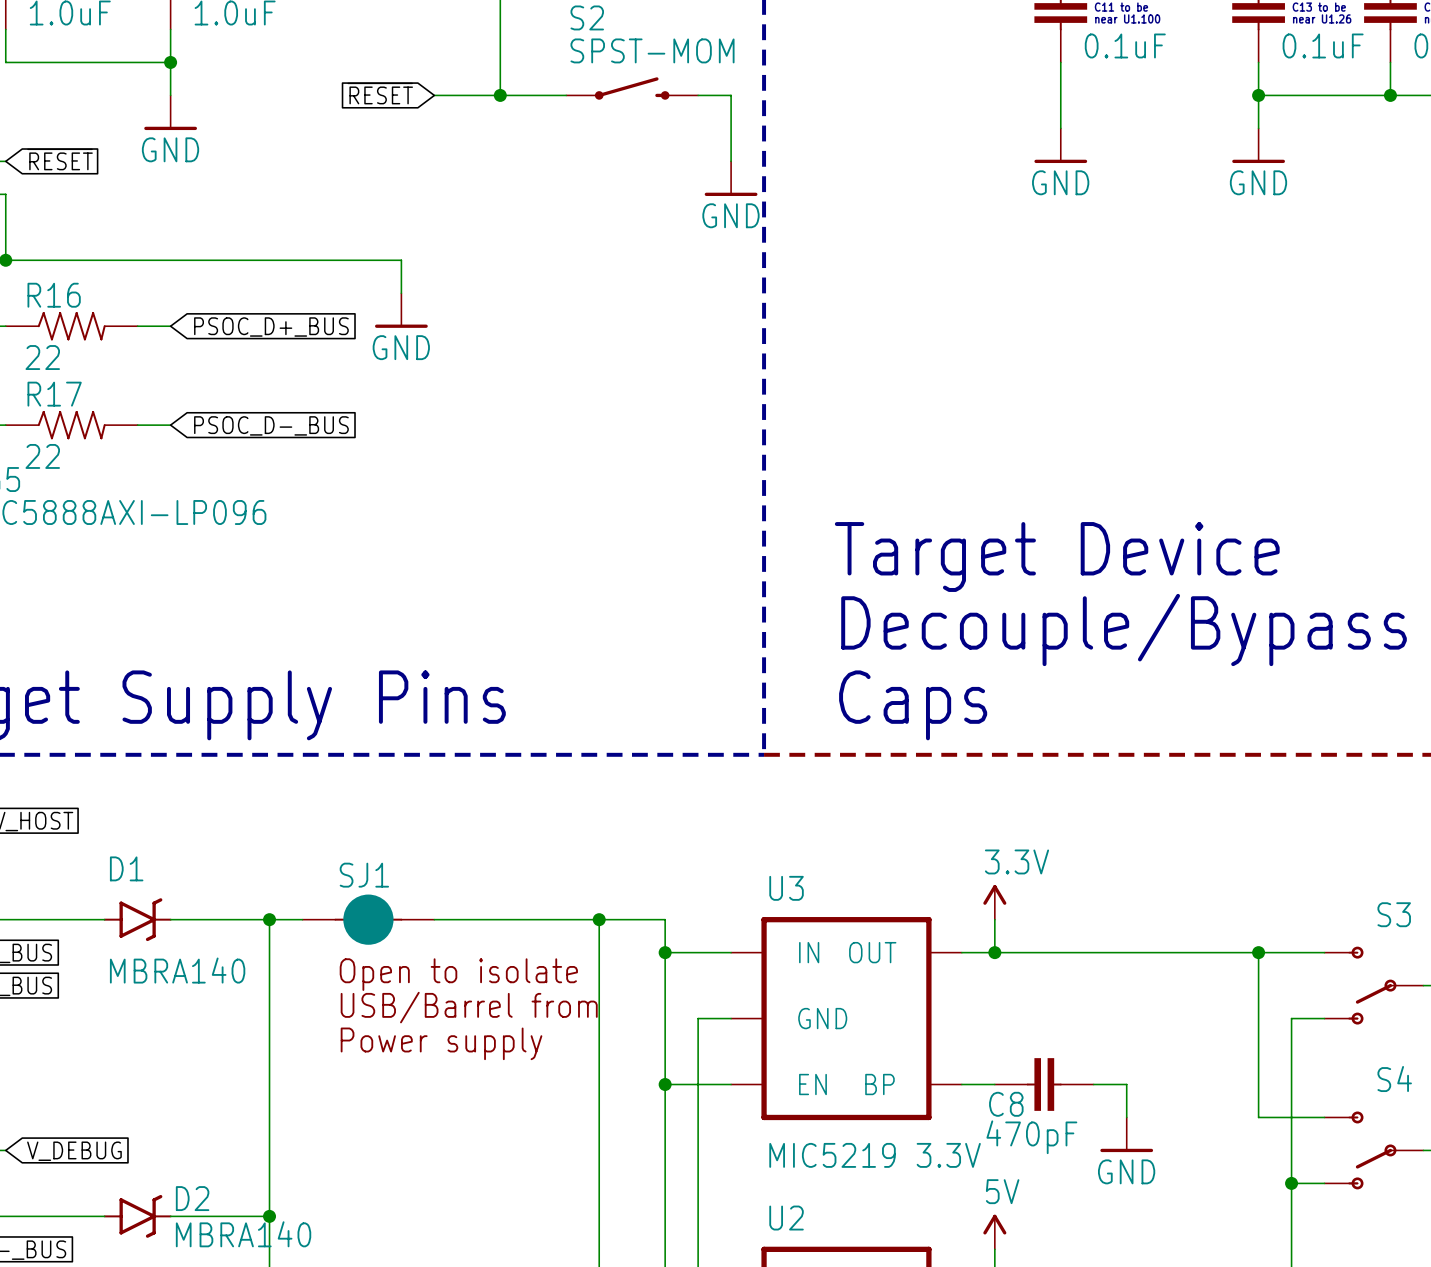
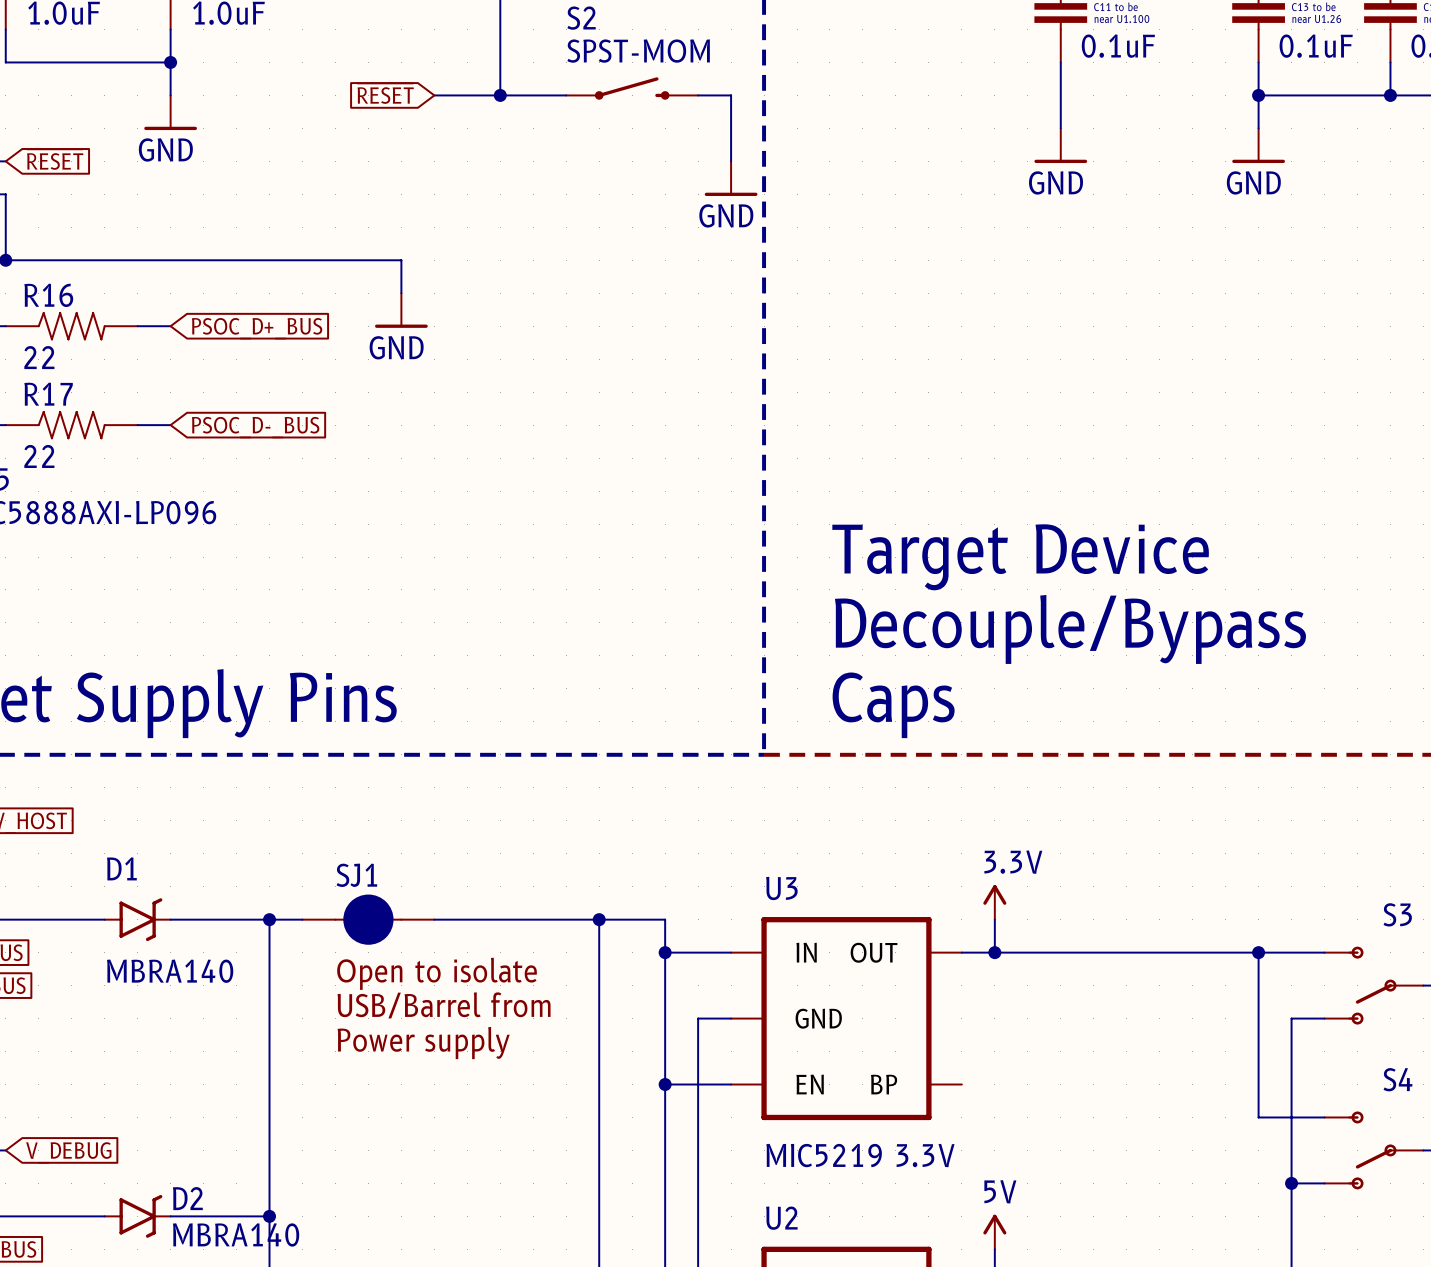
wire: (961, 1084) (994, 1084) -> none
C8: 470pF (1044, 1084) -> none
wire: (1093, 1084) (1126, 1084) (1126, 1117) -> none
power symbol: GND (1126, 1134) -> none

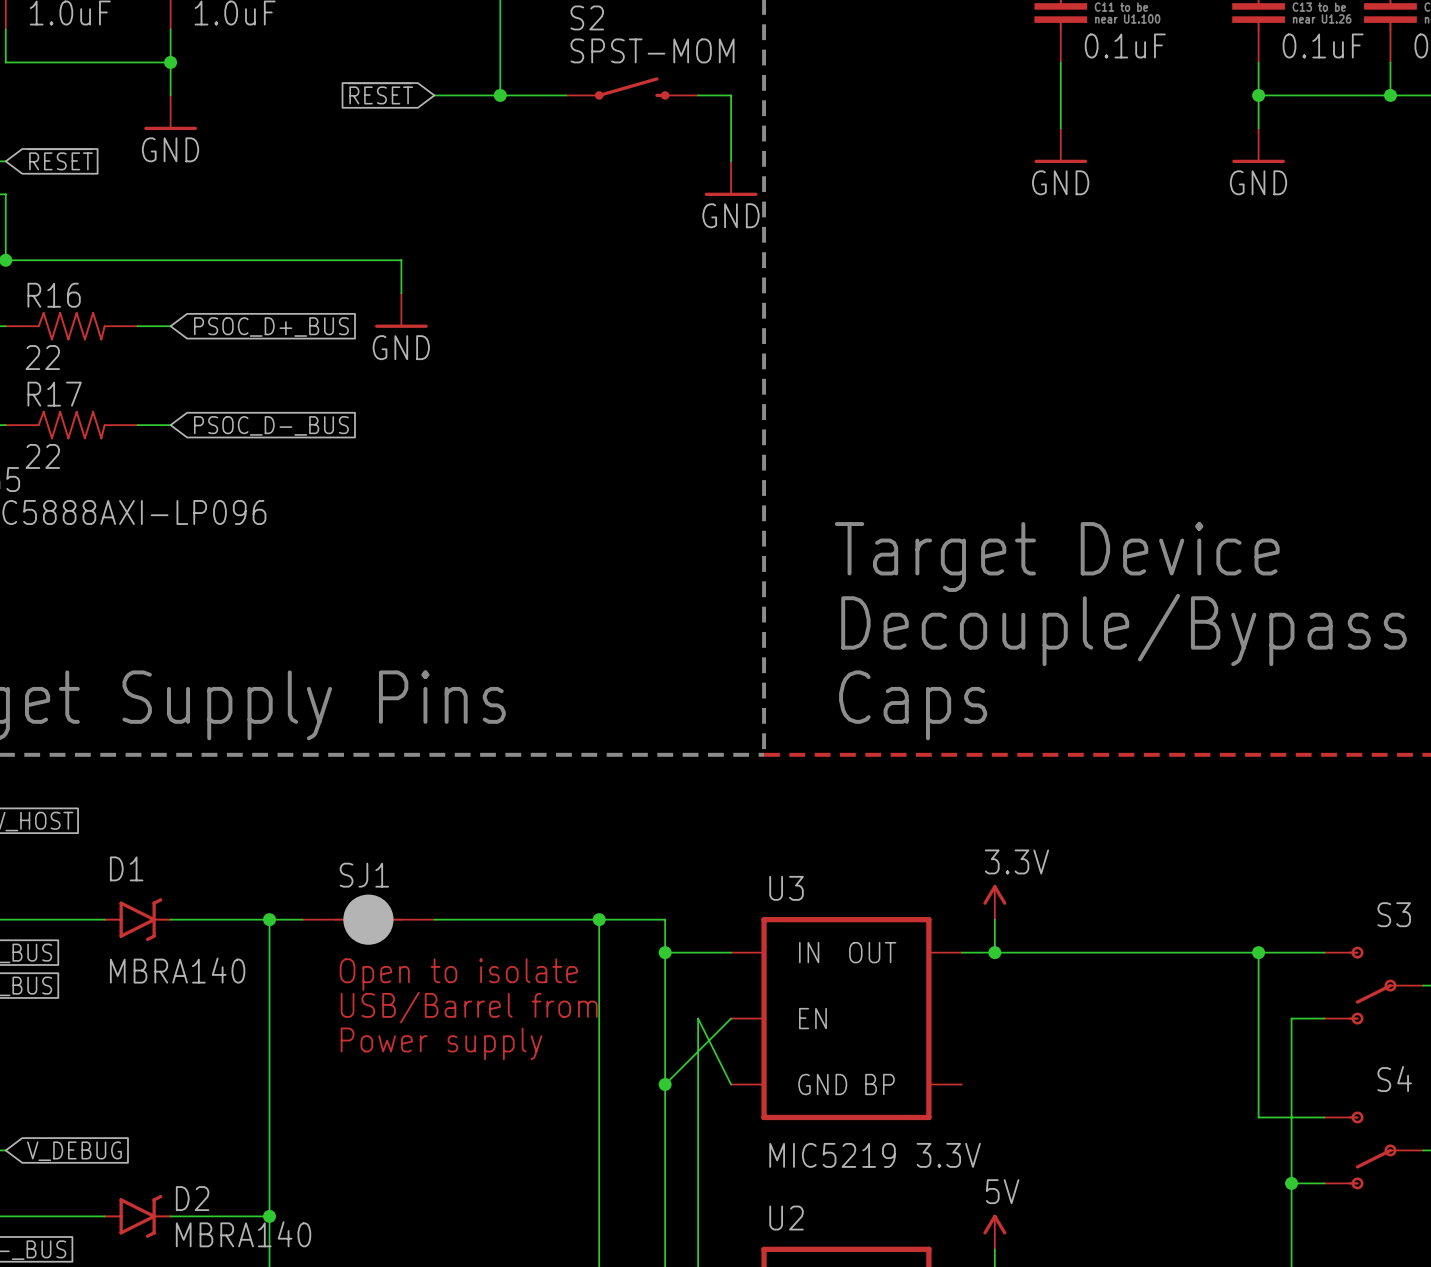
wire: (698, 1018) (731, 1018) -> (698, 1018) (731, 1084)
U3 pin name: GND (818, 1018) -> EN (812, 1018)
wire: (665, 1084) (731, 1084) -> (665, 1084) (731, 1018)
U3 pin name: EN (810, 1084) -> GND (822, 1084)

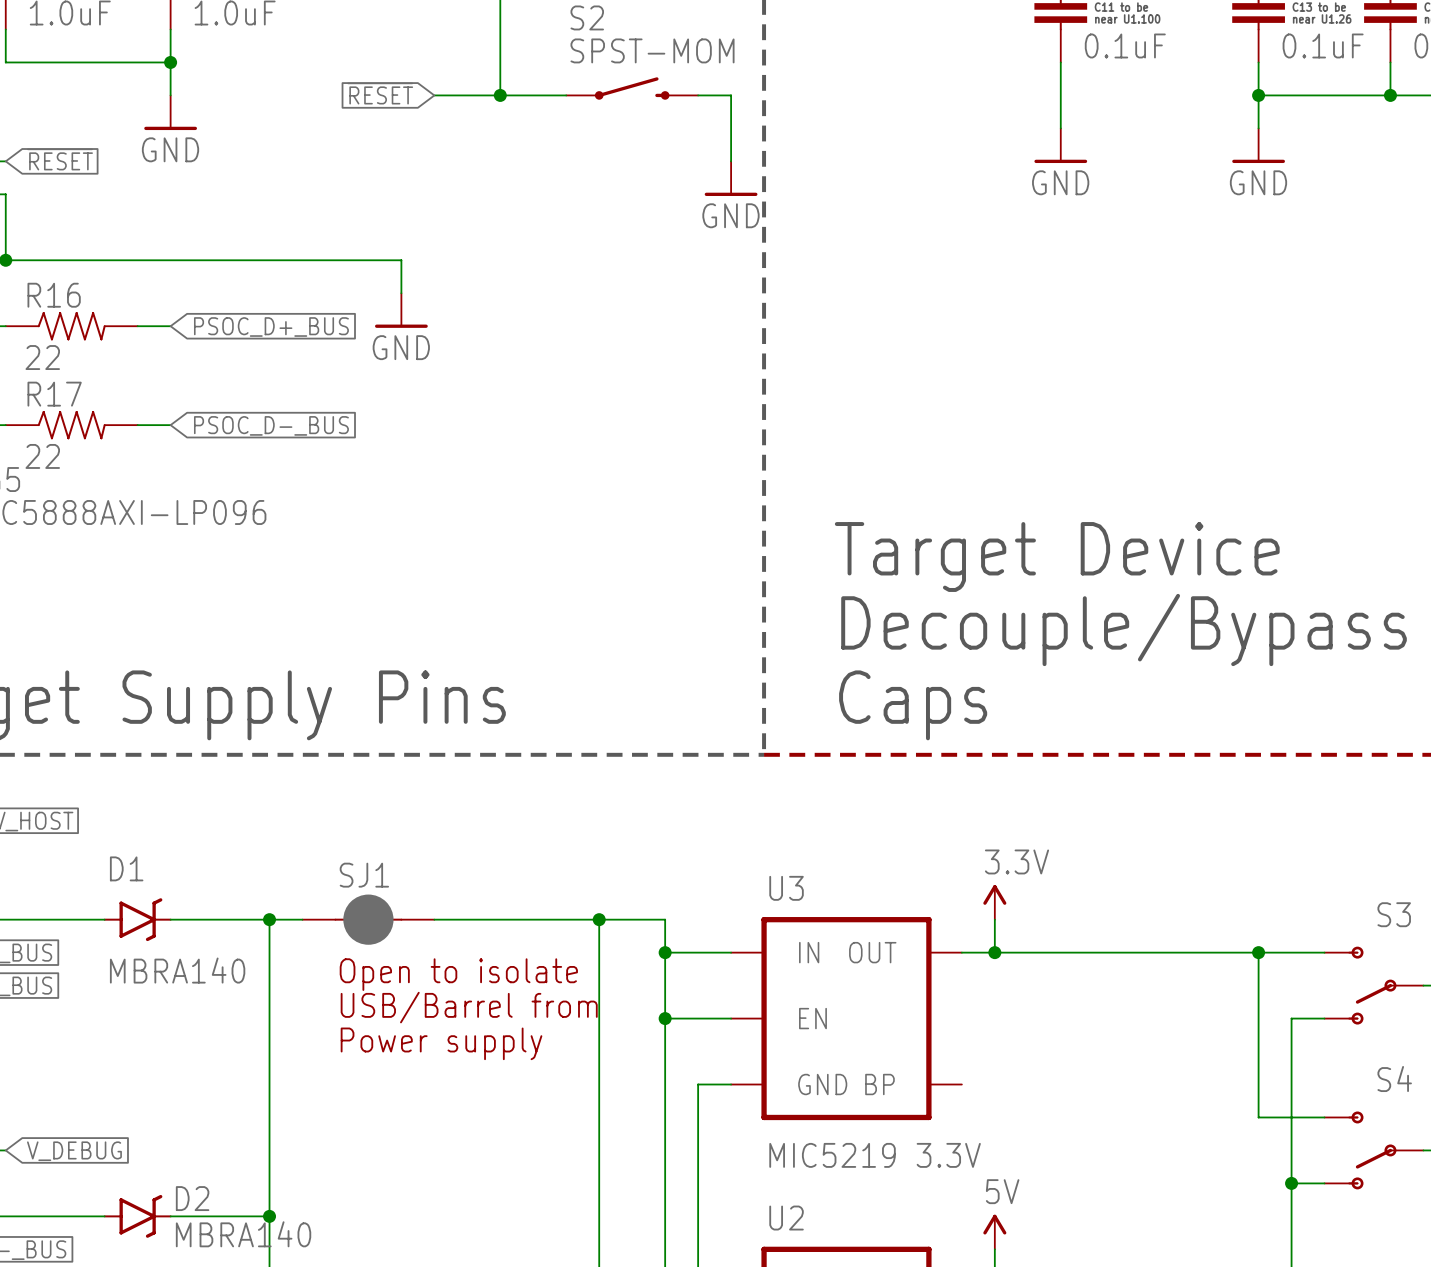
wire: (731, 1018) (665, 1084) -> (731, 1018) (665, 1018)
junction position: (665, 1084) -> (665, 1018)
wire: (698, 1084) (698, 1018) (731, 1084) -> (698, 1084) (731, 1084)

